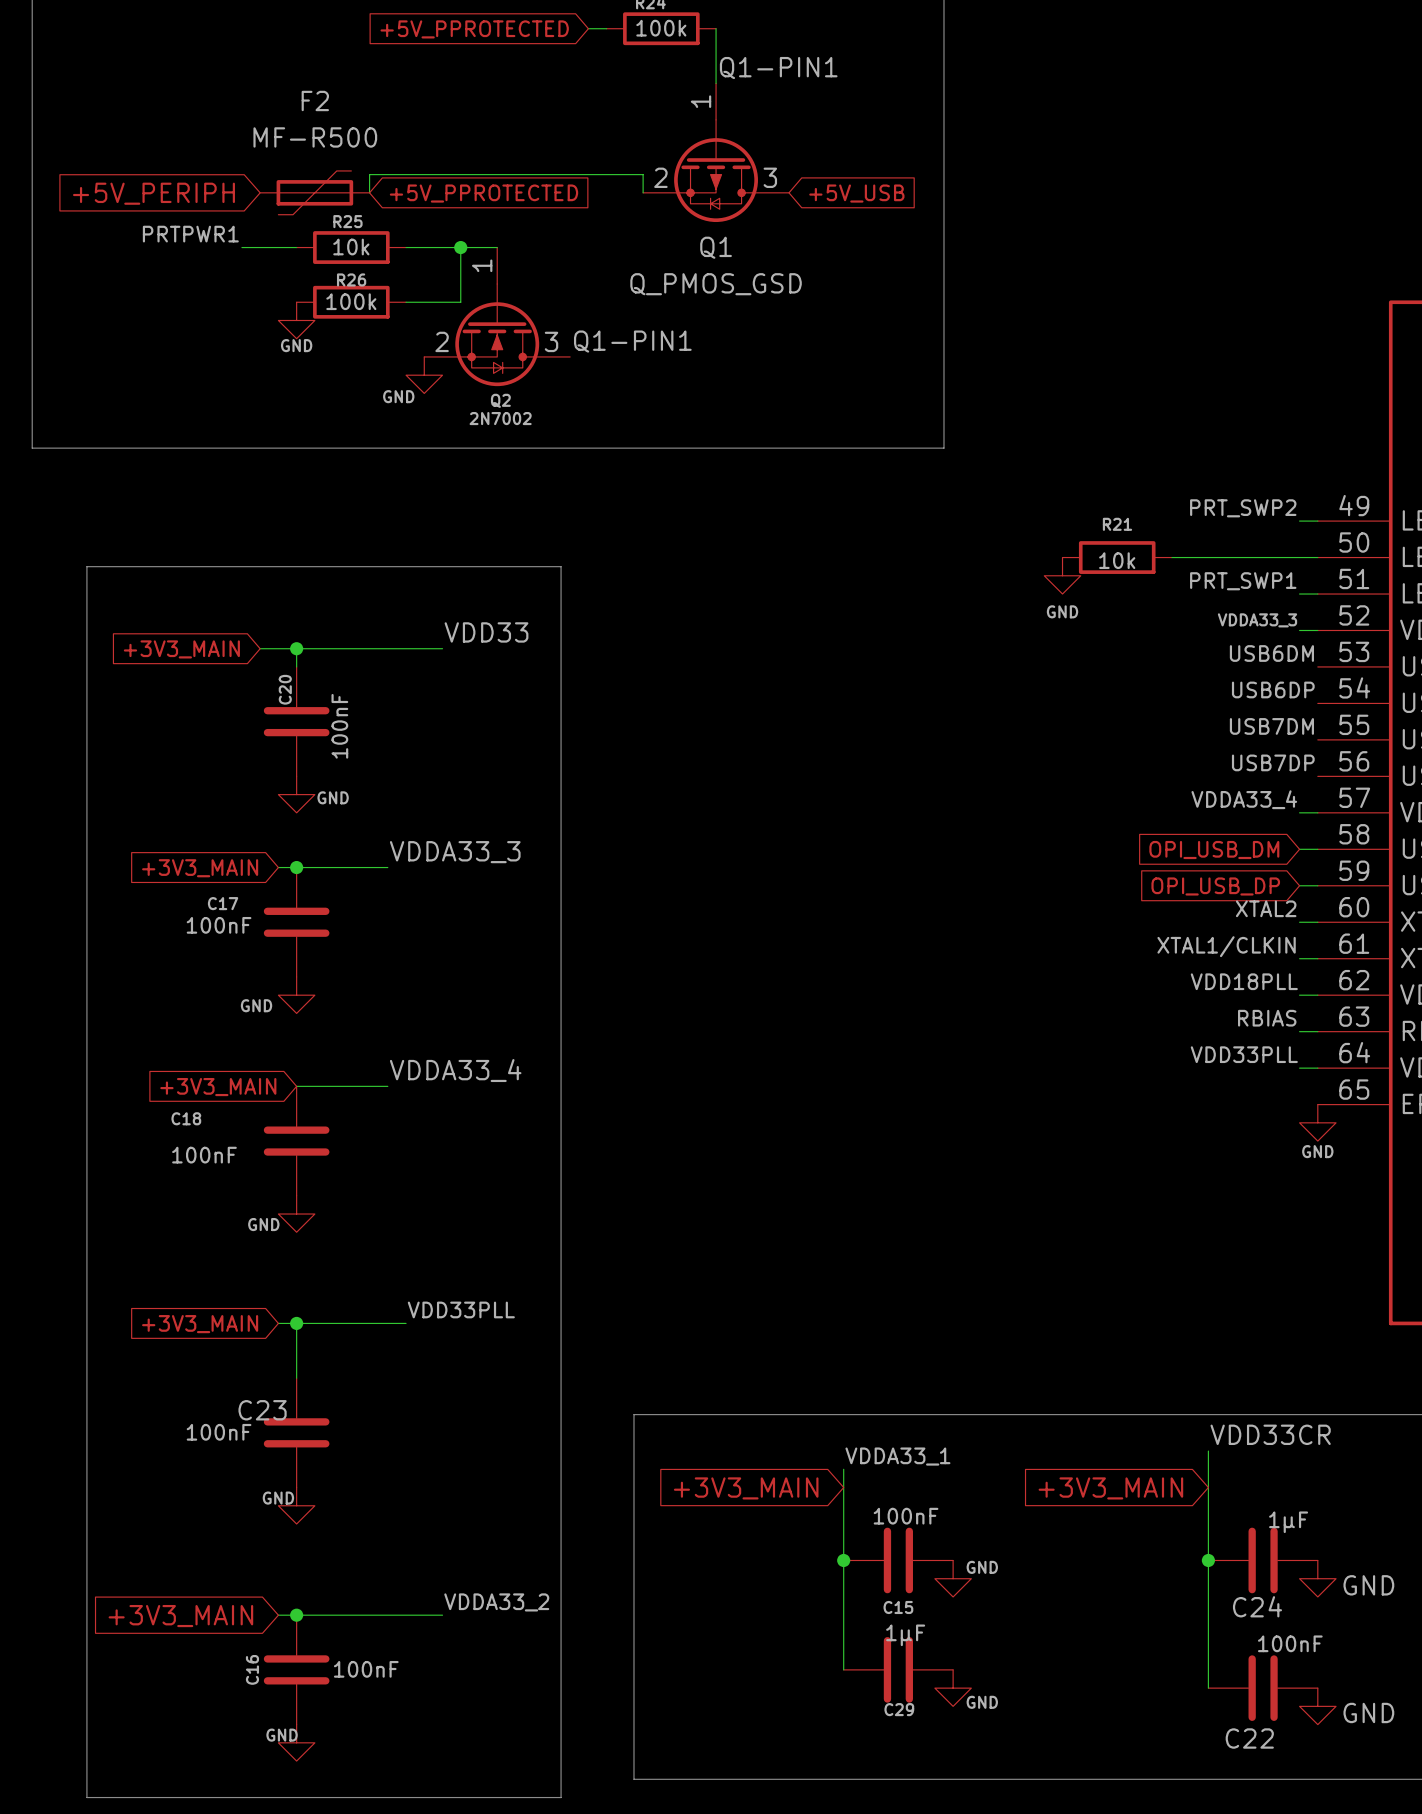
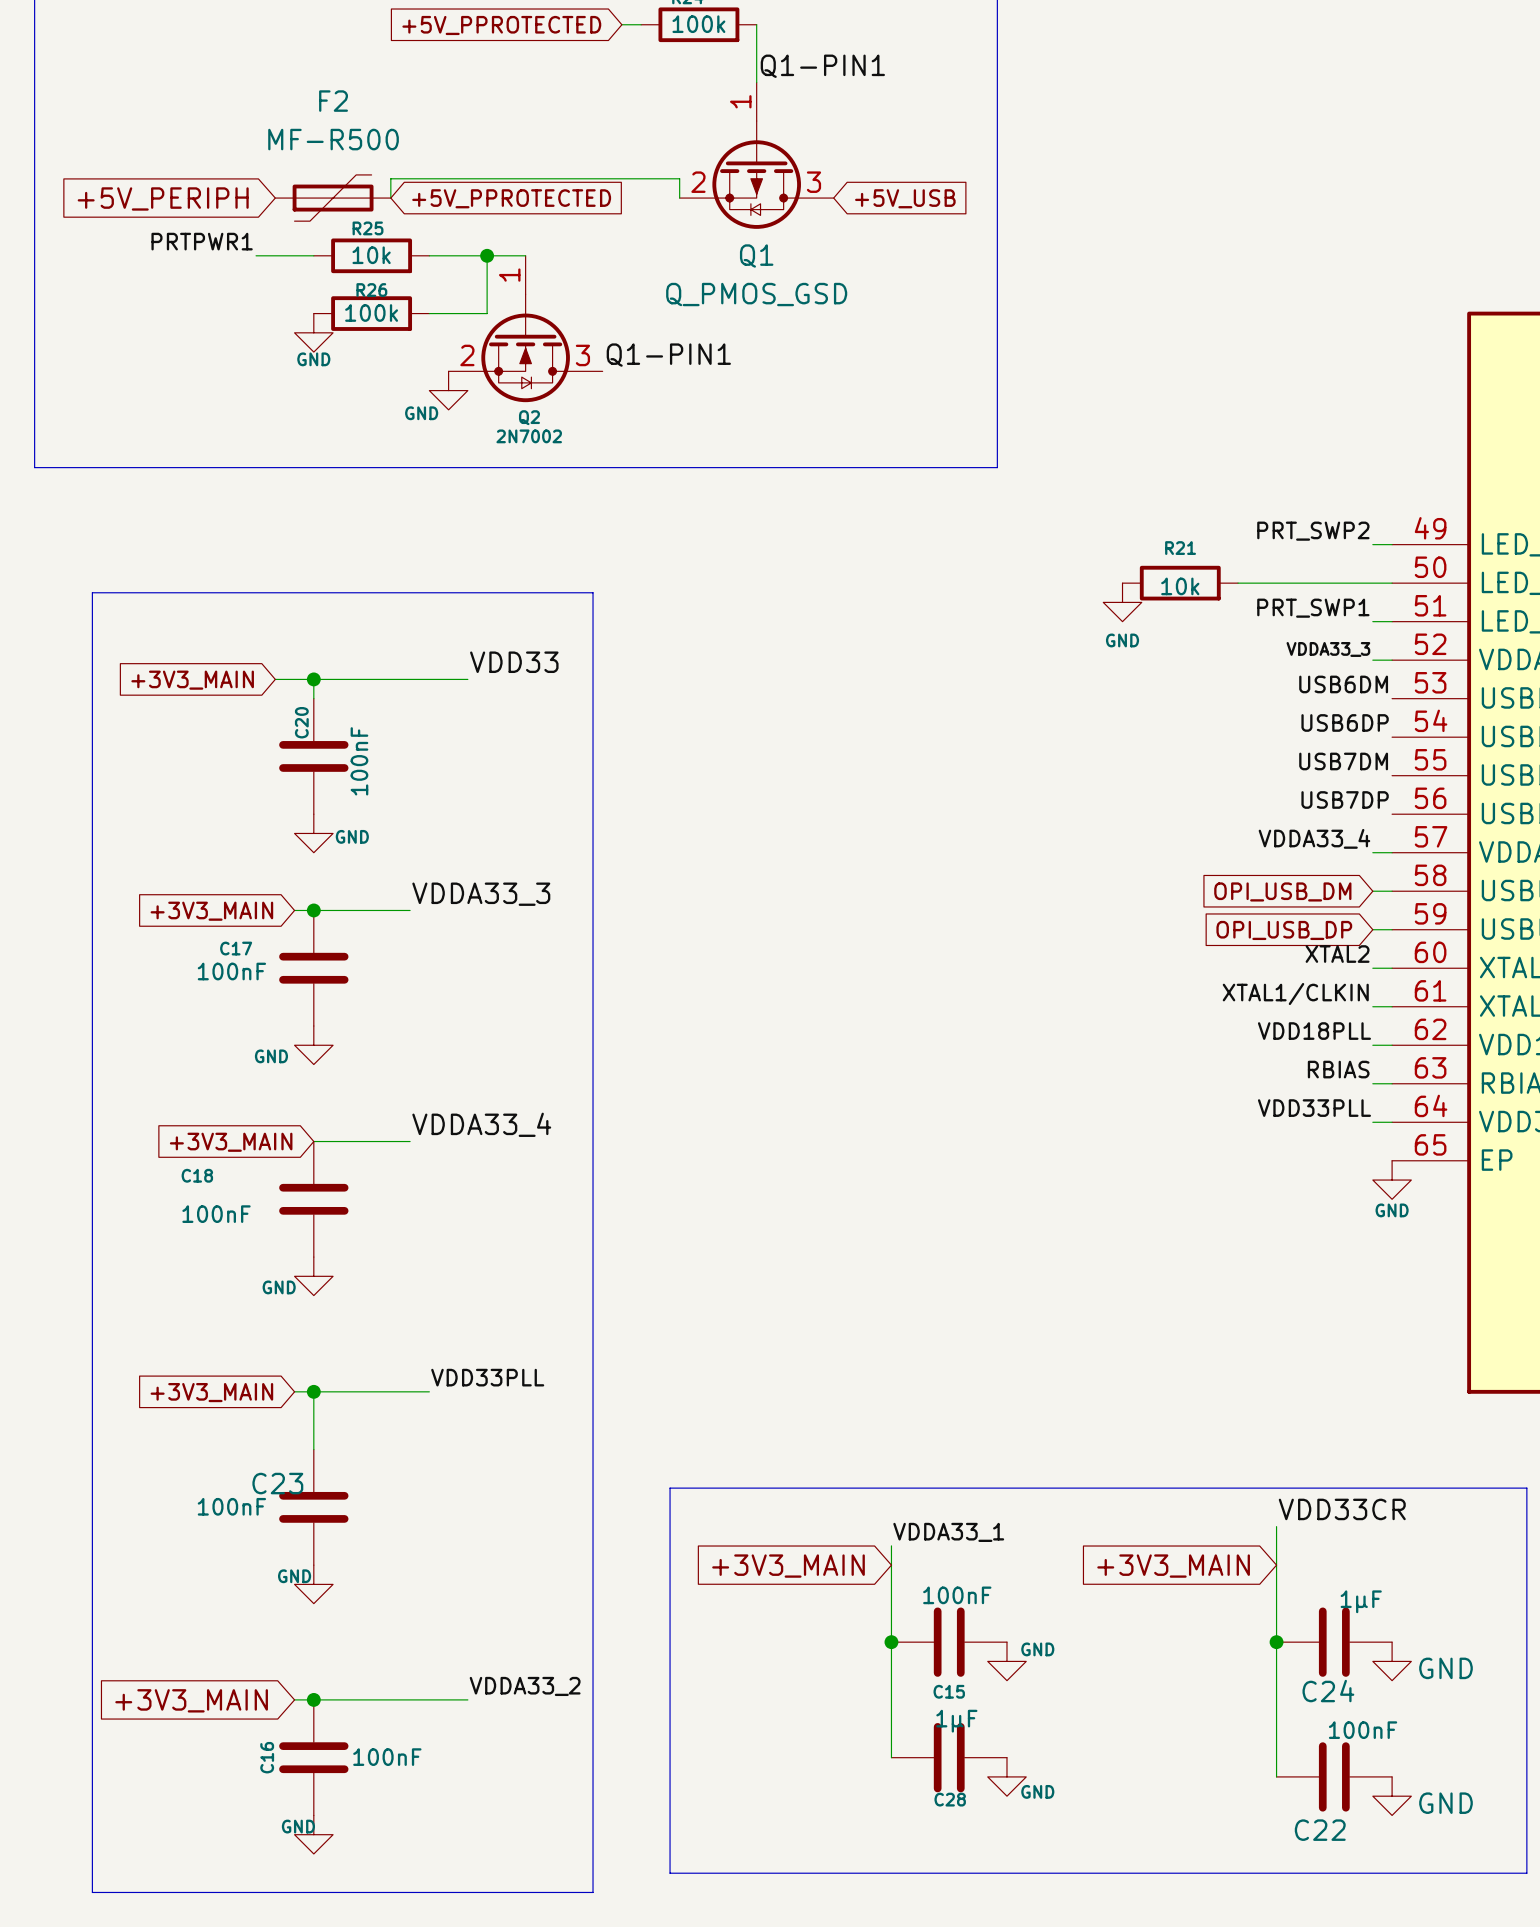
C29 name: C29 (899, 1709) -> C28 (950, 1799)

